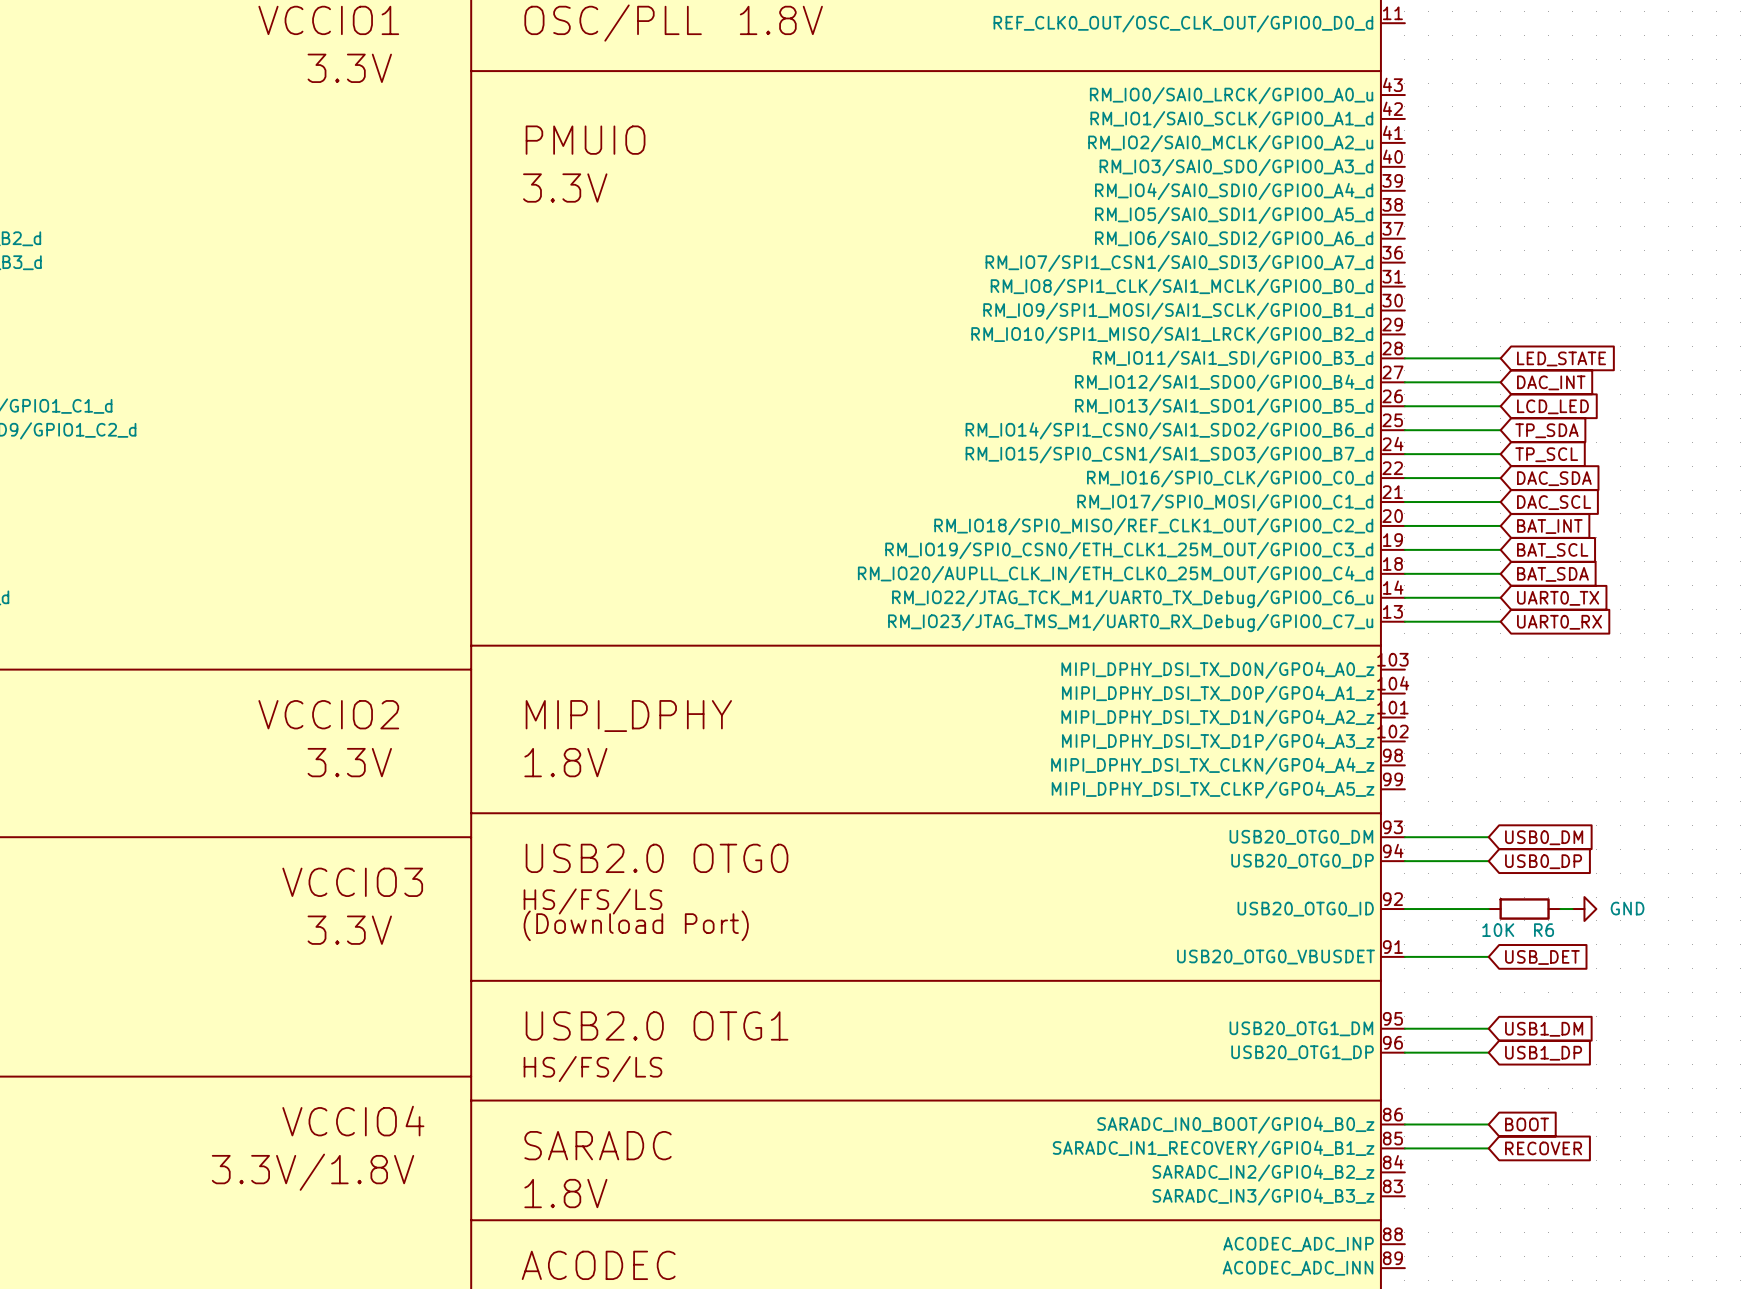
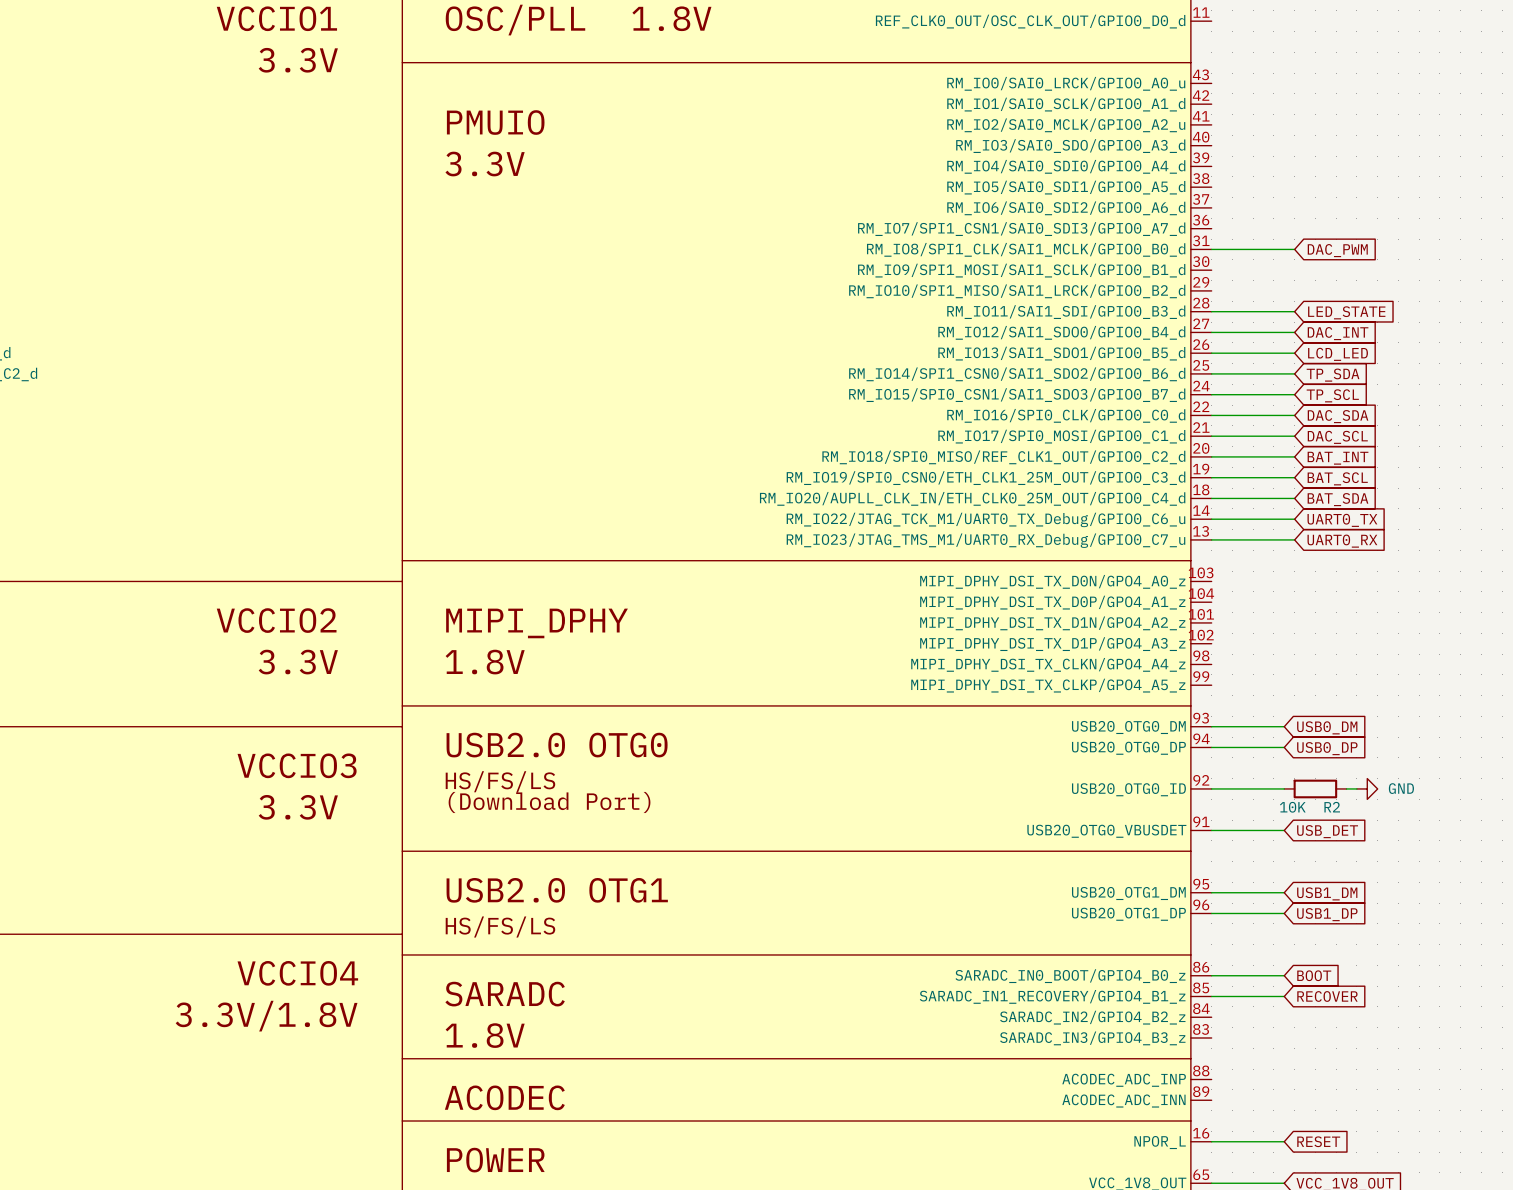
wire: none -> (1211, 249) (1294, 249)
global label: none -> DAC_PWM (1337, 250)
R6 name: R6 (1544, 930) -> R2 (1332, 807)

